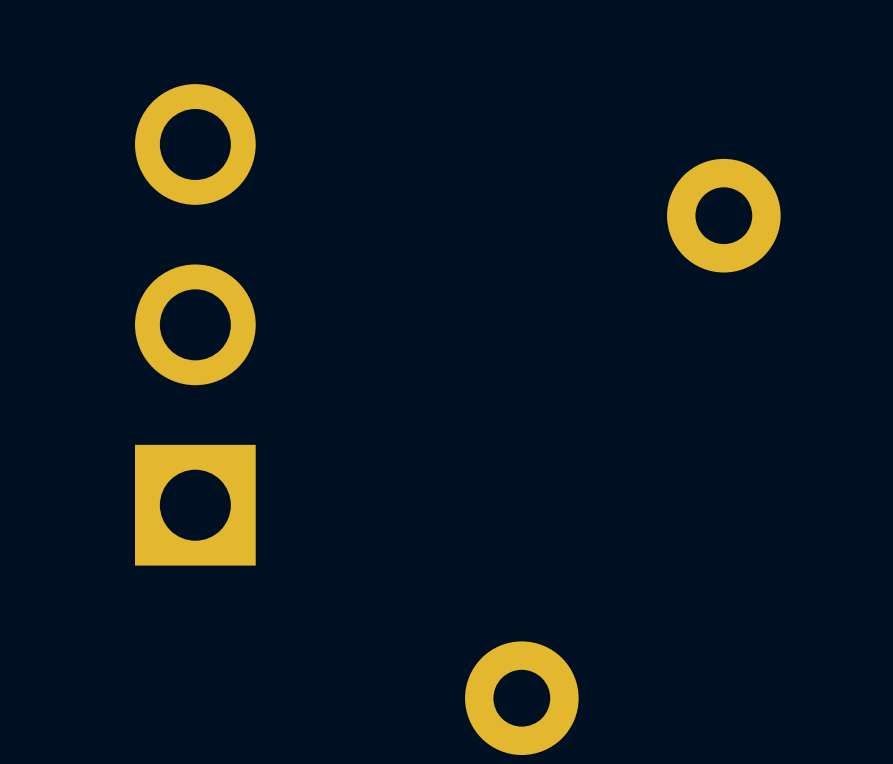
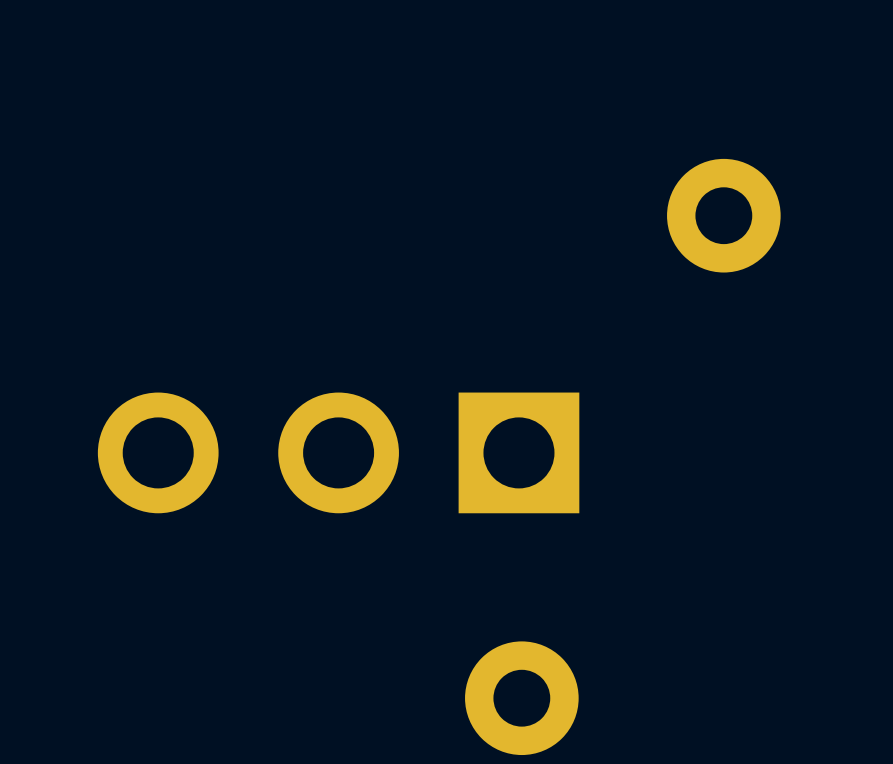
part rotation: 0° (195, 324) -> 90° counterclockwise (338, 452)

